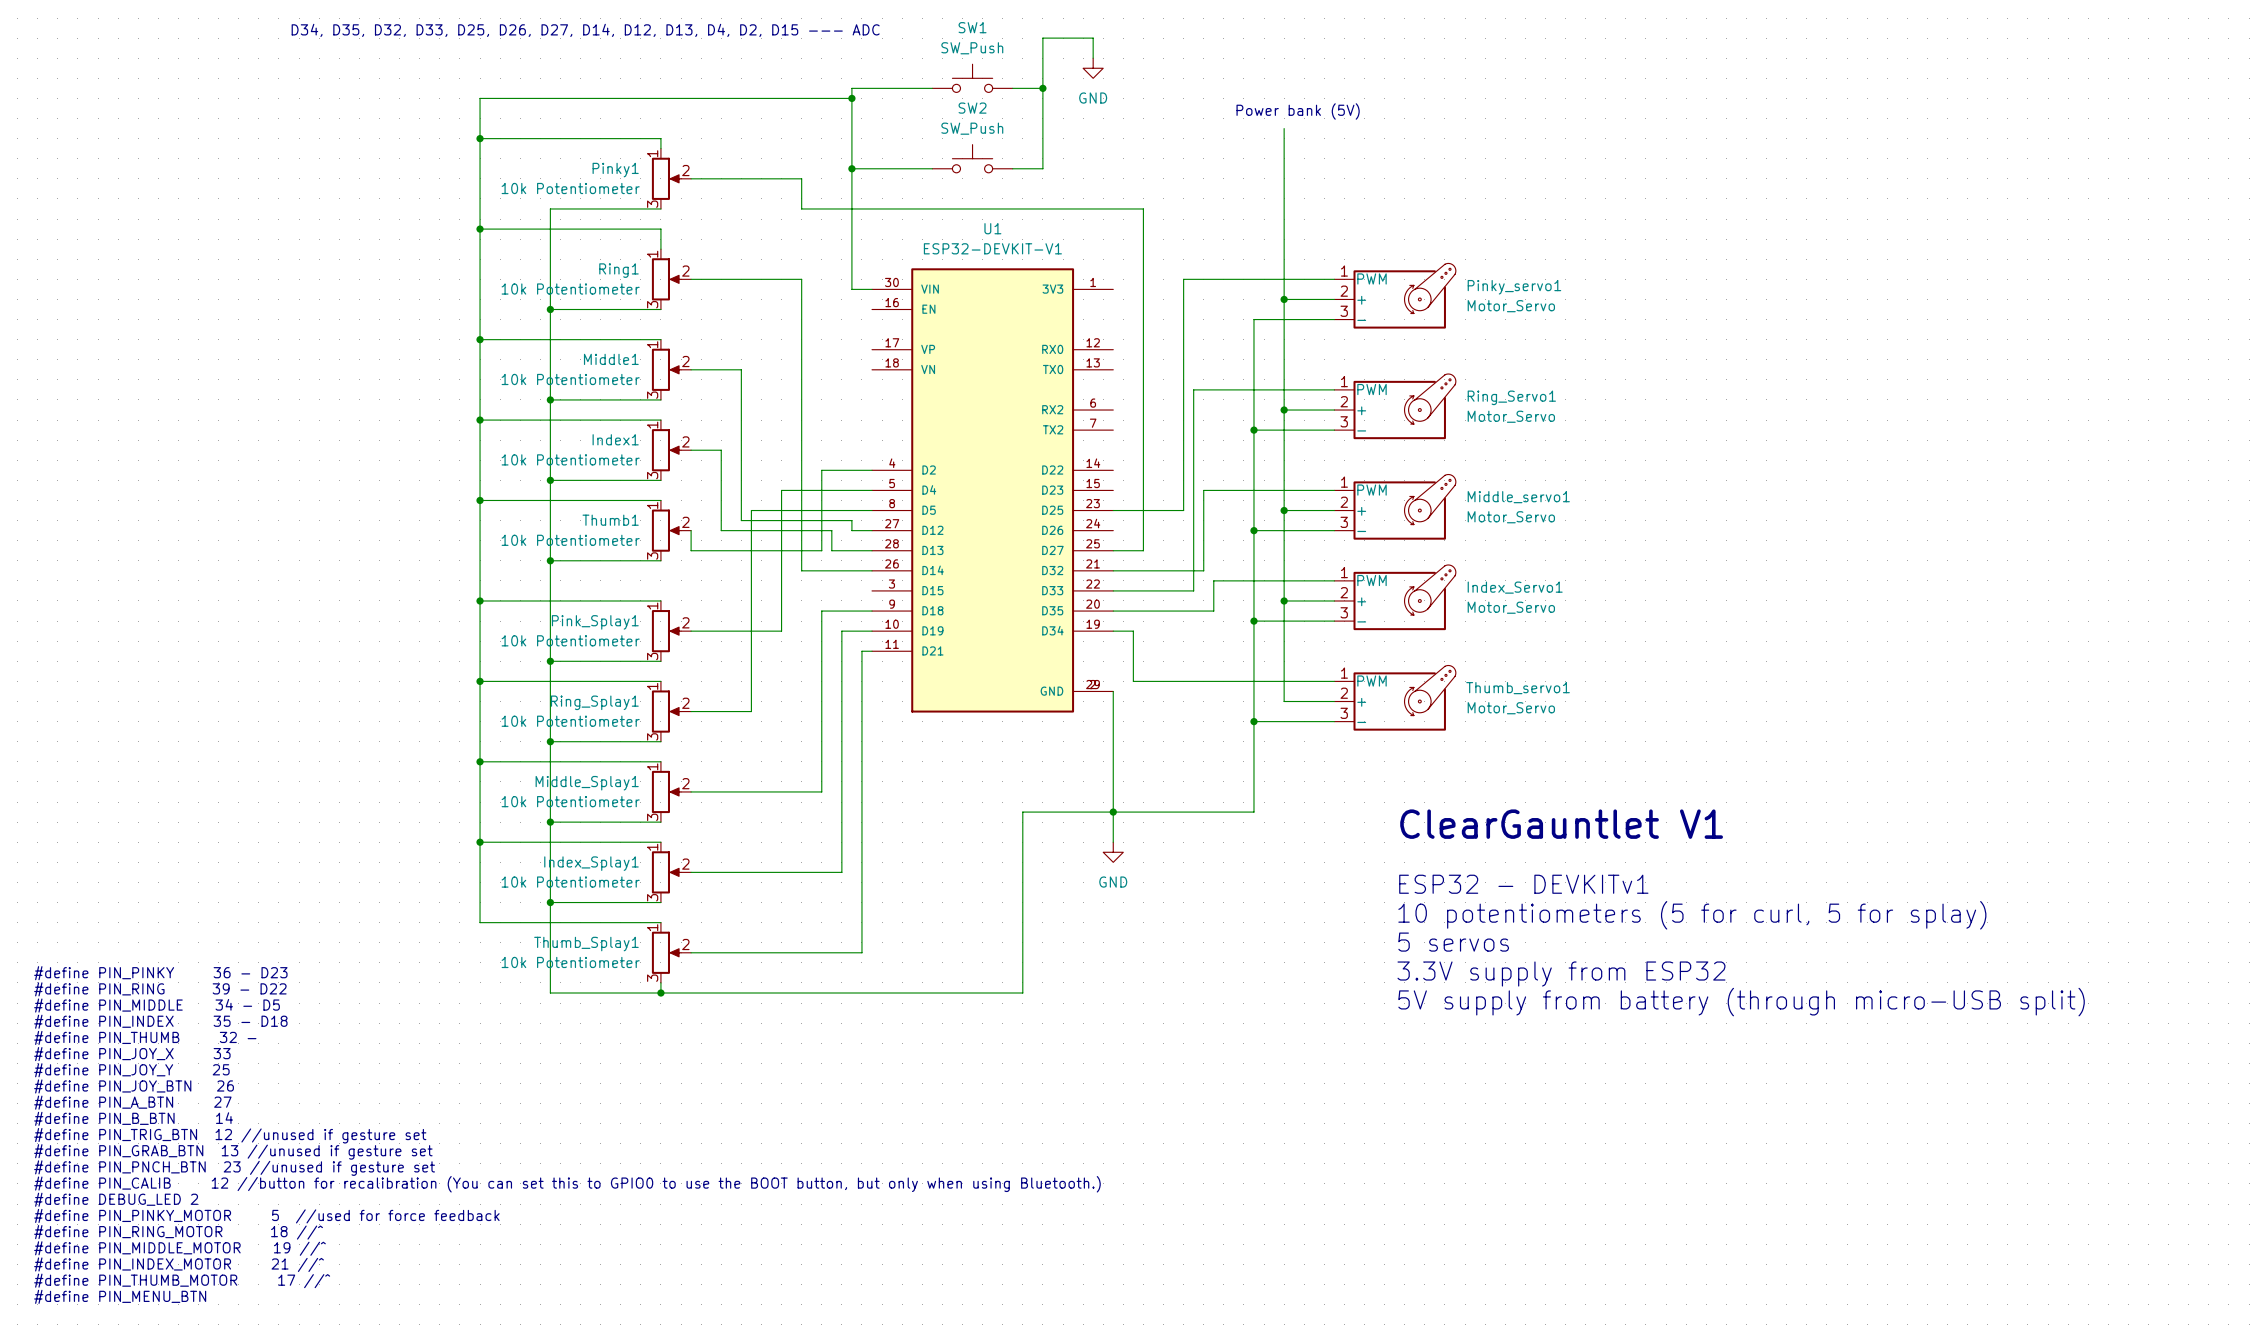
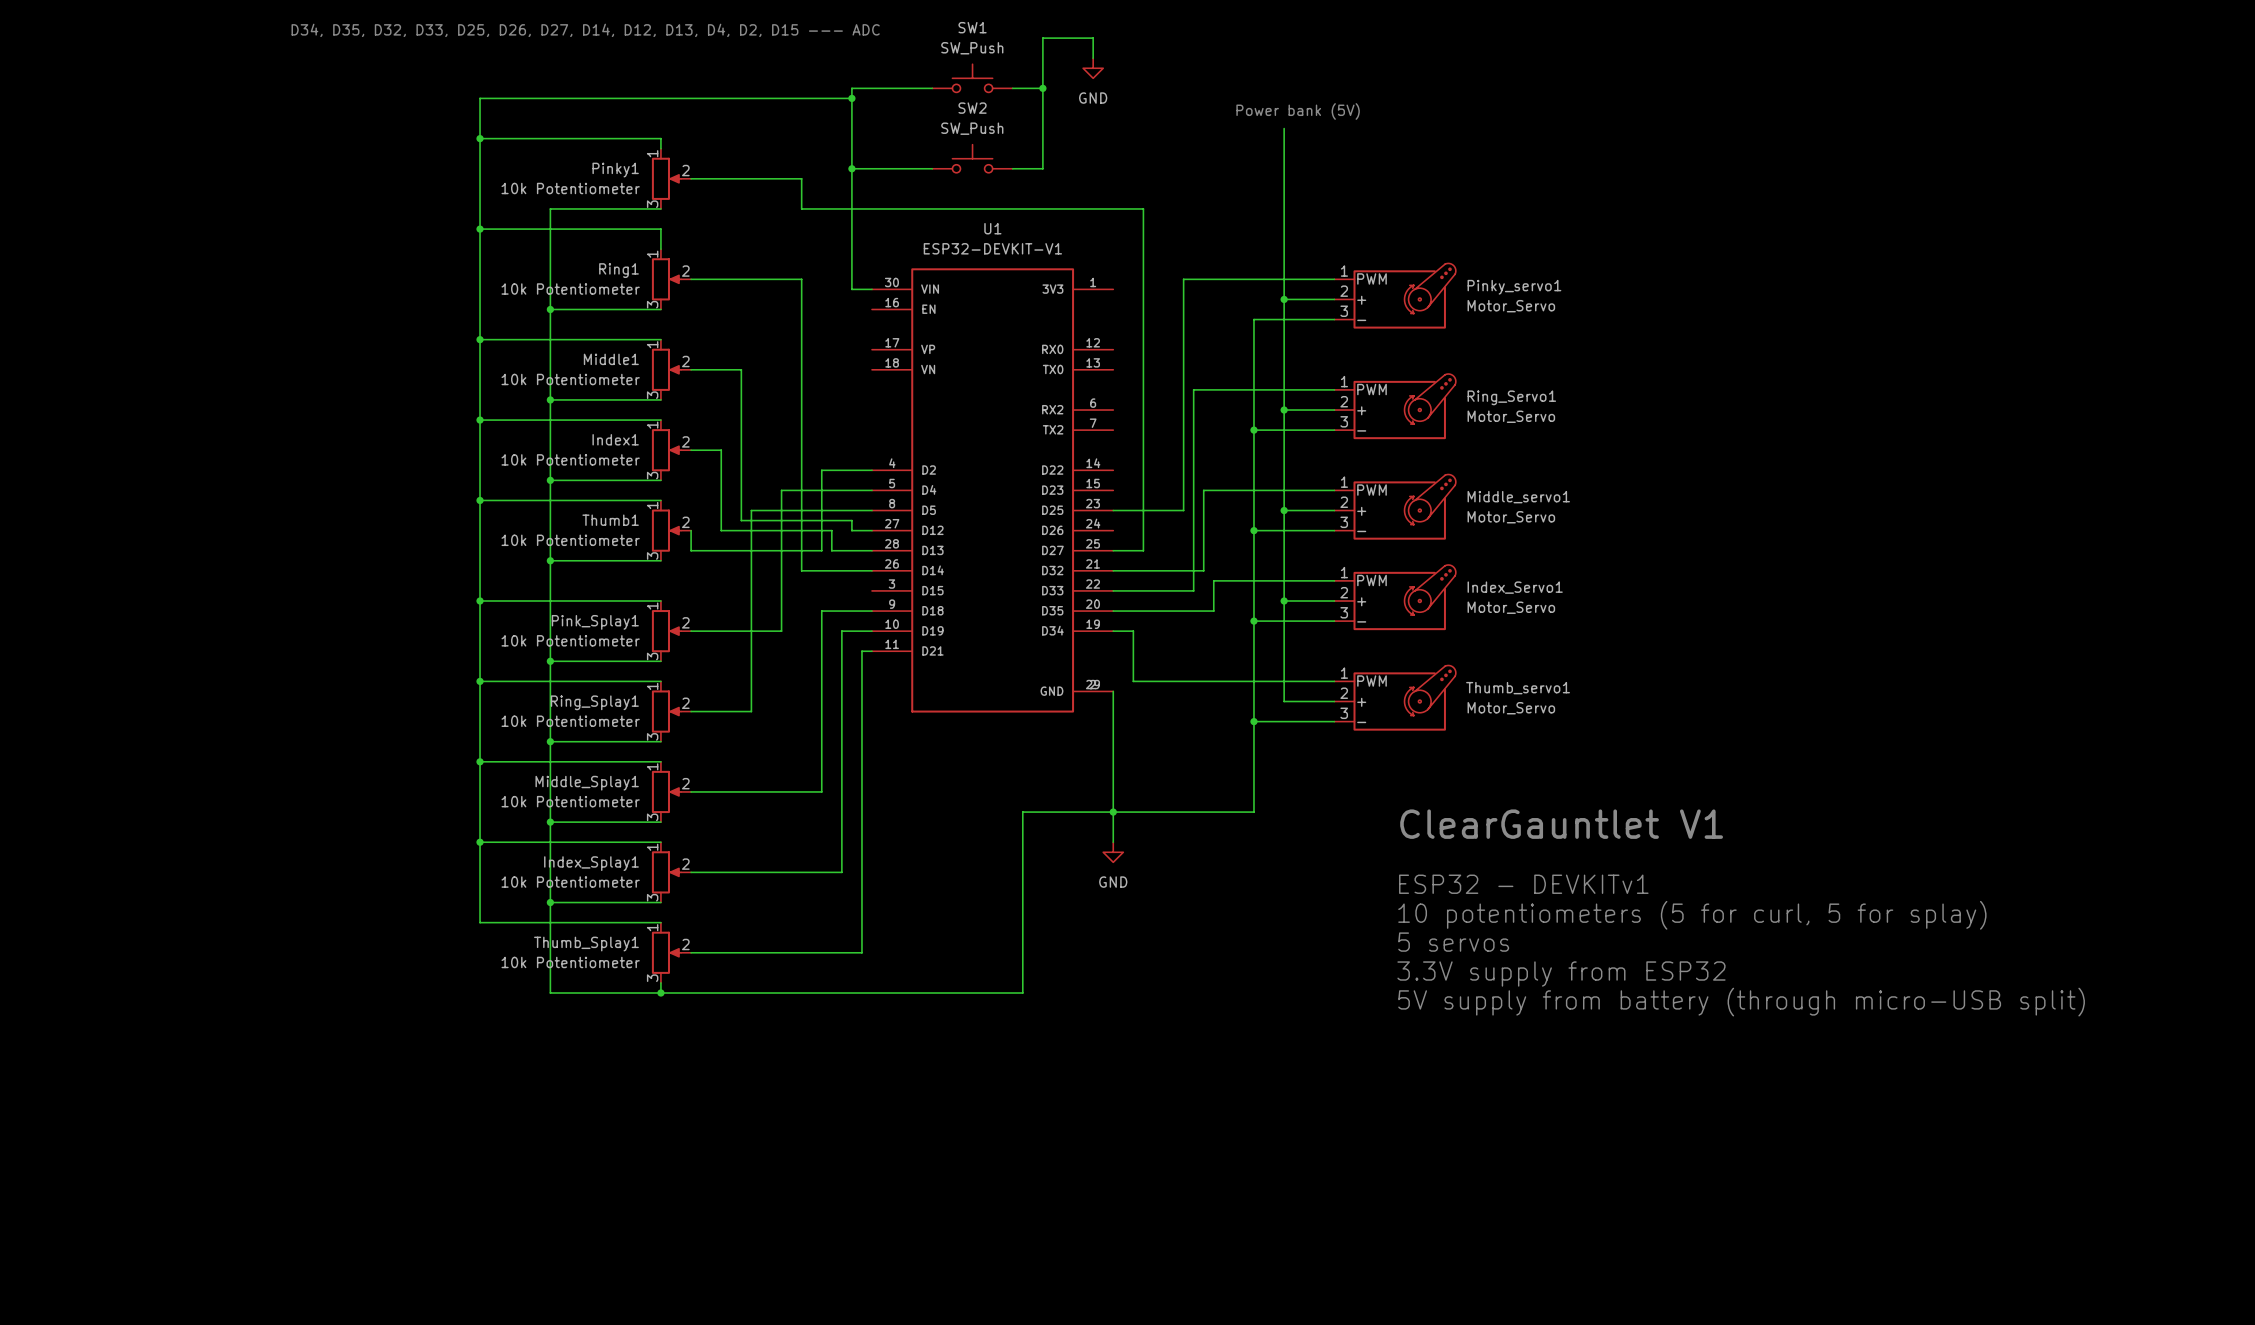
text: #define PIN_PINKY 36 - D23 (160, 973) -> none
text: #define PIN_RING 39 - D22 (160, 989) -> none
text: #define PIN_MIDDLE 34 - D5 (157, 1005) -> none
text: #define PIN_INDEX 35 - D18 (160, 1021) -> none
text: #define PIN_THUMB 32 - (145, 1037) -> none
text: #define PIN_JOY_X 33 (132, 1054) -> none
text: #define PIN_JOY_Y 25 (131, 1070) -> none
text: #define PIN_JOY_BTN 26 (134, 1086) -> none
text: #define PIN_A_BTN 27 (132, 1102) -> none
text: #define PIN_B_BTN 14 (133, 1118) -> none
text: #define PIN_TRIG_BTN 12 //unused if gesture set (230, 1135) -> none
text: #define PIN_GRAB_BTN 13 //unused if gesture set (233, 1151) -> none
text: #define PIN_PNCH_BTN 23 //unused if gesture set (234, 1168) -> none
text: #define PIN_CALIB 12 //button for recalibration (You can set this to GPIO0 to use the BOOT button, but only when using Bluetooth.) (567, 1184) -> none
text: #define DEBUG_LED 2 (116, 1199) -> none
text: #define PIN_PINKY_MOTOR 5 //used for force feedback (266, 1216) -> none
text: #define PIN_RING_MOTOR 18 //^ (178, 1232) -> none
text: #define PIN_MIDDLE_MOTOR 19 //^ (179, 1248) -> none
text: #define PIN_INDEX_MOTOR 21 //^ (179, 1264) -> none
text: #define PIN_THUMB_MOTOR 17 //^ (182, 1280) -> none
text: #define PIN_MENU_BTN (120, 1296) -> none

